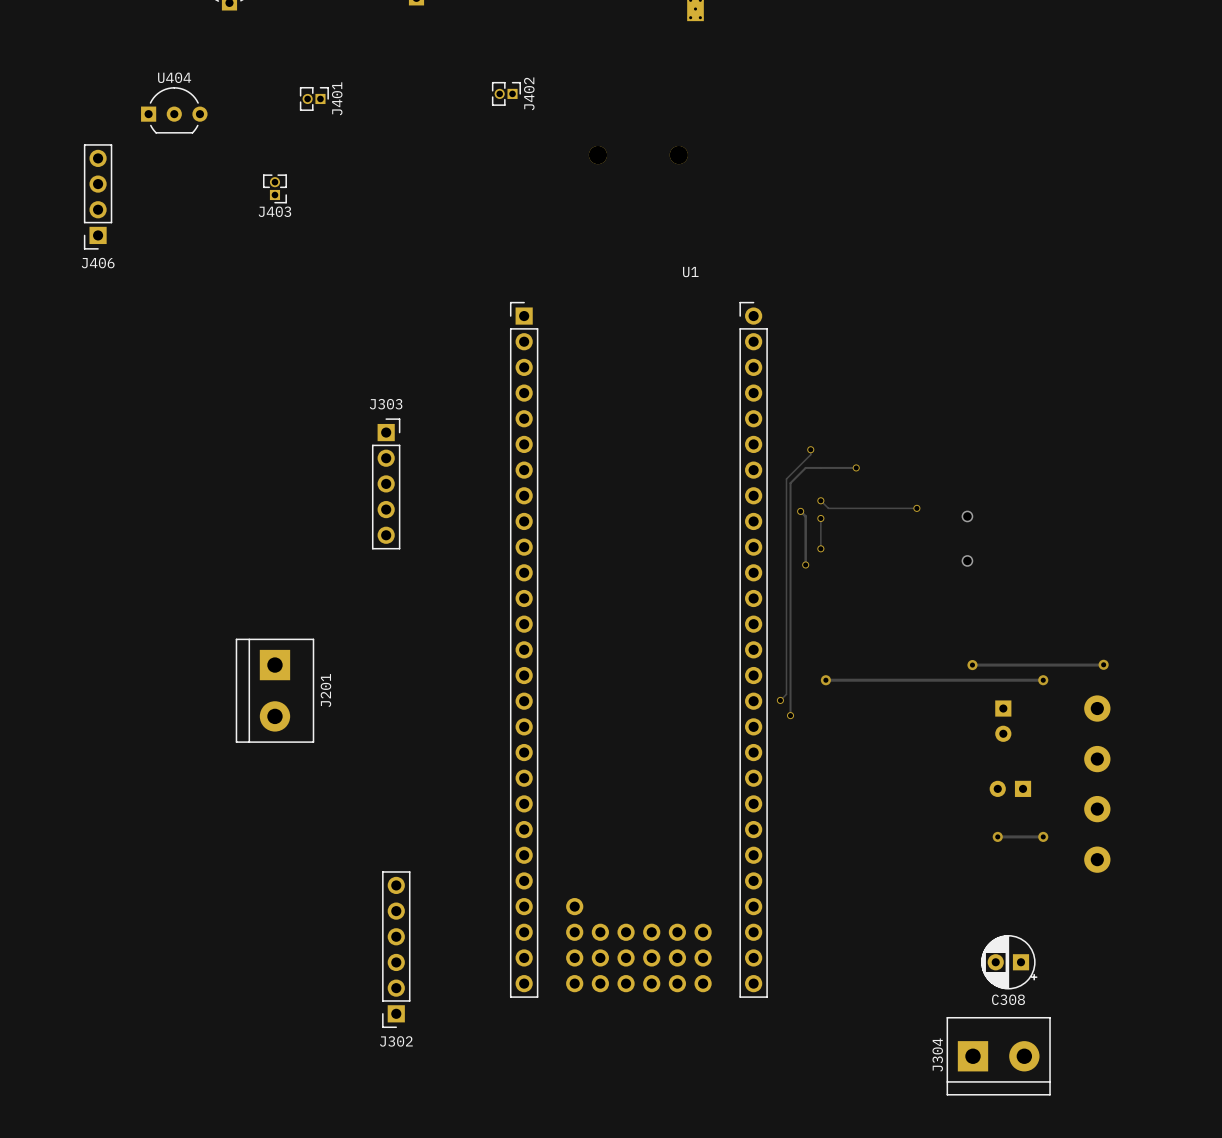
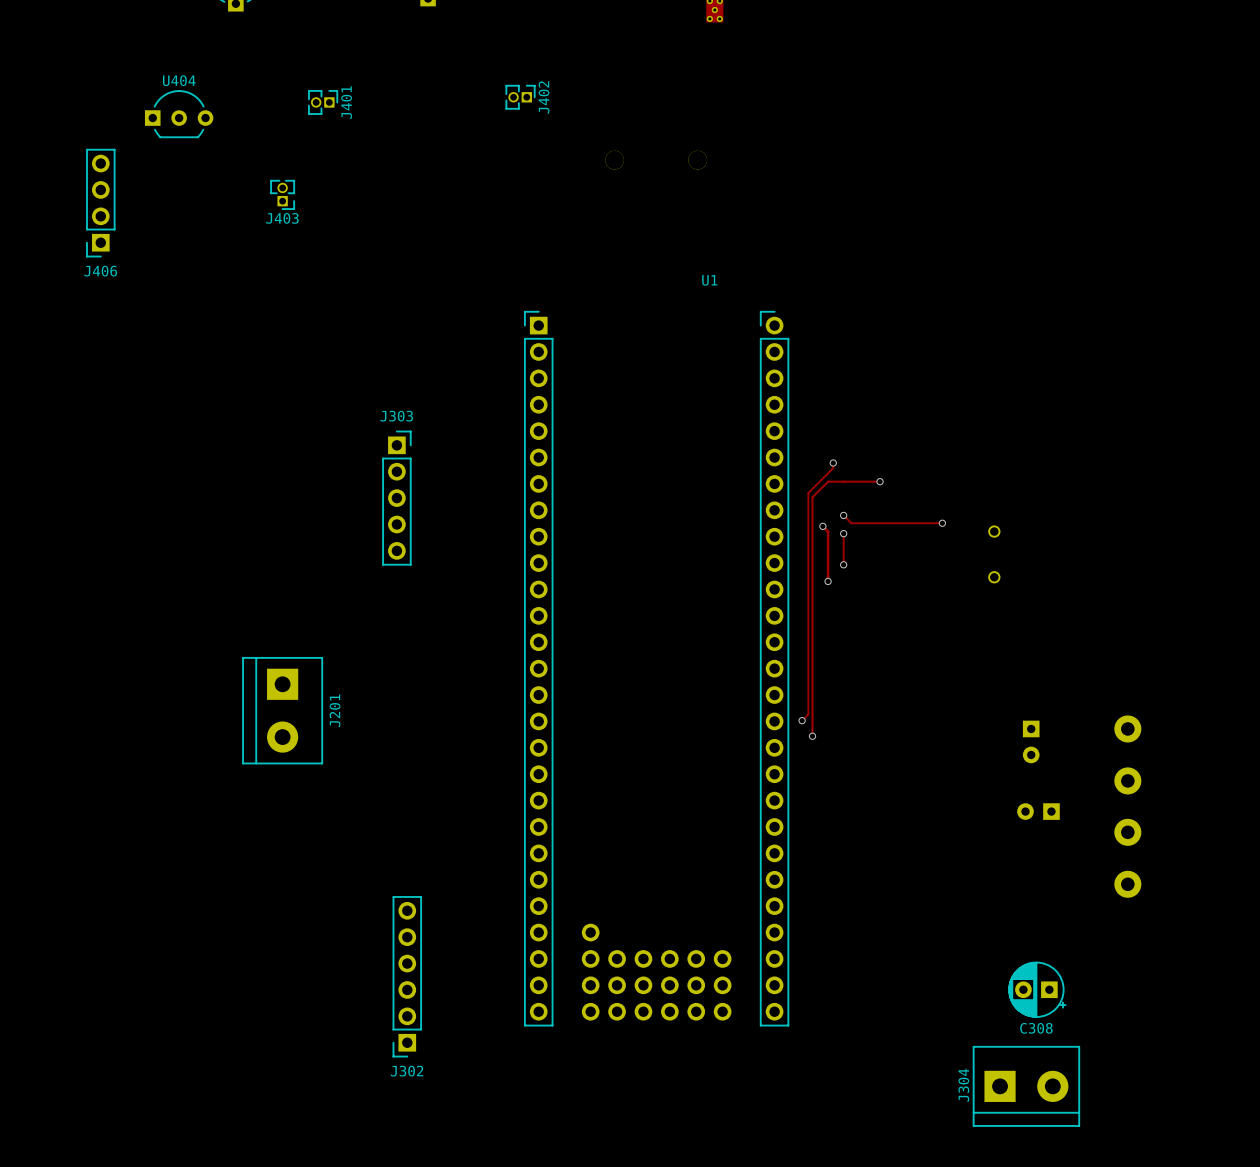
track: (1103, 664) (972, 665) -> none
via: (1103, 664) -> none
via: (972, 665) -> none
track: (825, 680) (1043, 680) -> none
via: (825, 680) -> none
via: (1043, 680) -> none
track: (997, 836) (1043, 836) -> none
via: (997, 836) -> none
via: (1043, 836) -> none

